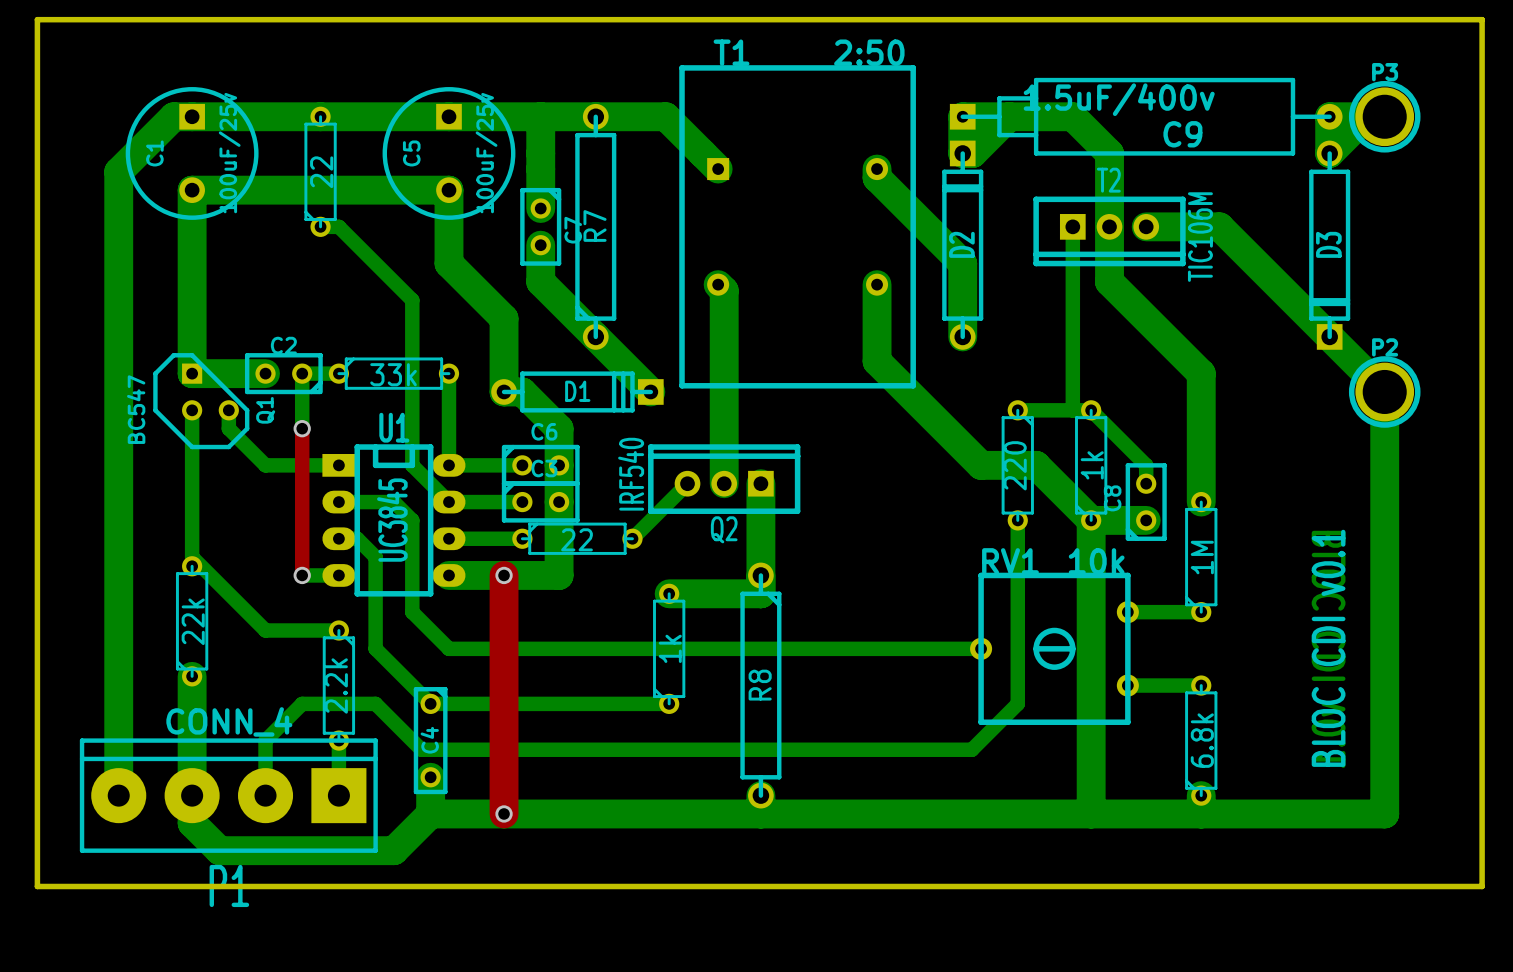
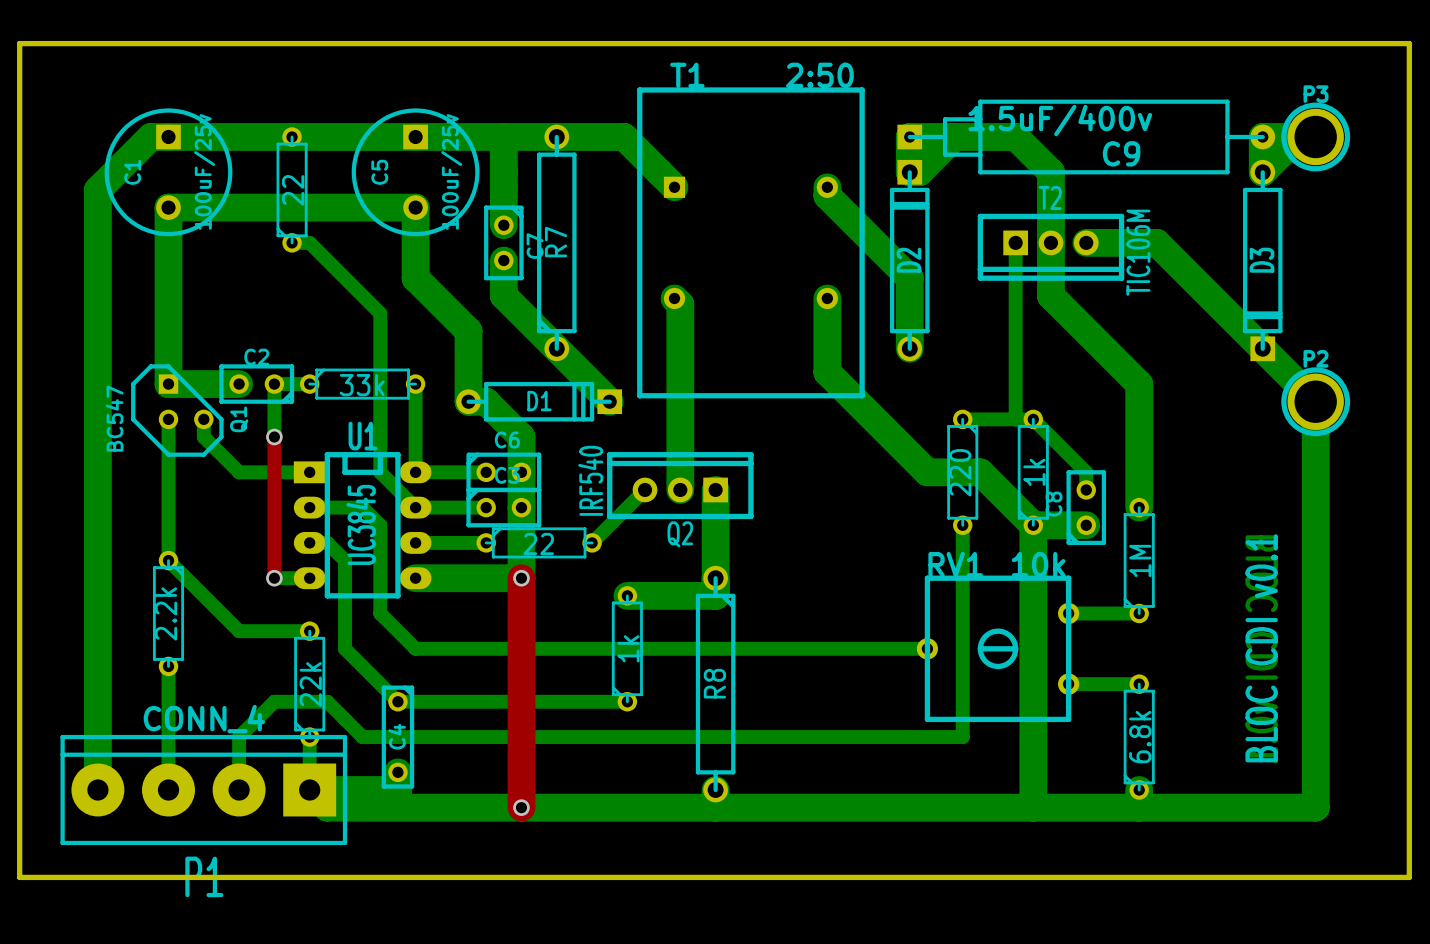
top track: (504, 575) (504, 813) -> (521, 578) (521, 807)
via position: (504, 575) -> (521, 578)
part rotation: 0° (192, 621) -> 180° (168, 613)
part value: 22k (193, 621) -> 2.2k (166, 613)
bottom track width: thick (192, 676) (192, 795) -> thin (168, 675) (168, 790)
part value: 2.2k (336, 685) -> 22k (310, 684)
part rotation: 0° (338, 685) -> 180° (309, 684)
bottom track: (357, 703) (375, 703) (421, 749) (971, 749) (1017, 703) -> (327, 701) (362, 737) (962, 737) (962, 701)
bottom track: (192, 795) (192, 823) (219, 850) (393, 850) (430, 813) (430, 795) -> (397, 807) (327, 807) (309, 790) (397, 790)
via position: (504, 813) -> (521, 807)

